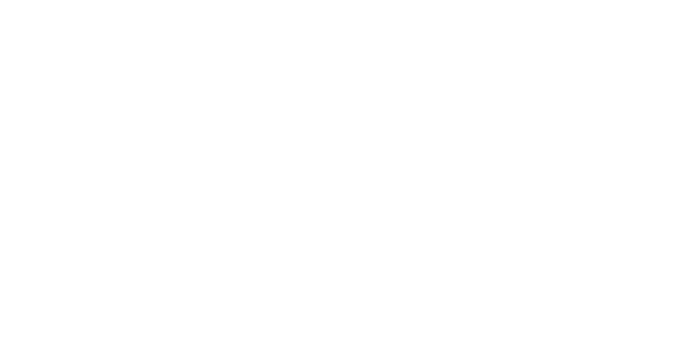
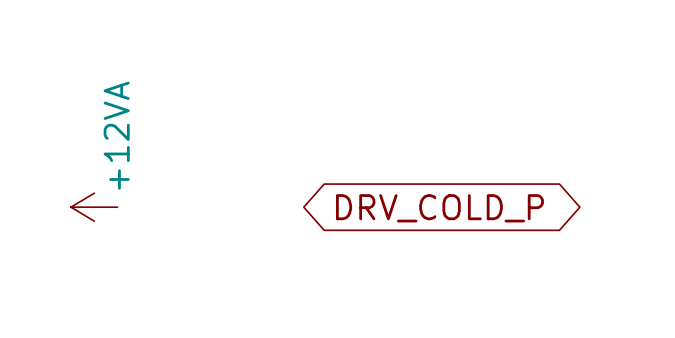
power symbol: none -> +12VA (94, 207)
global label: none -> DRV_COLD_P (439, 208)

